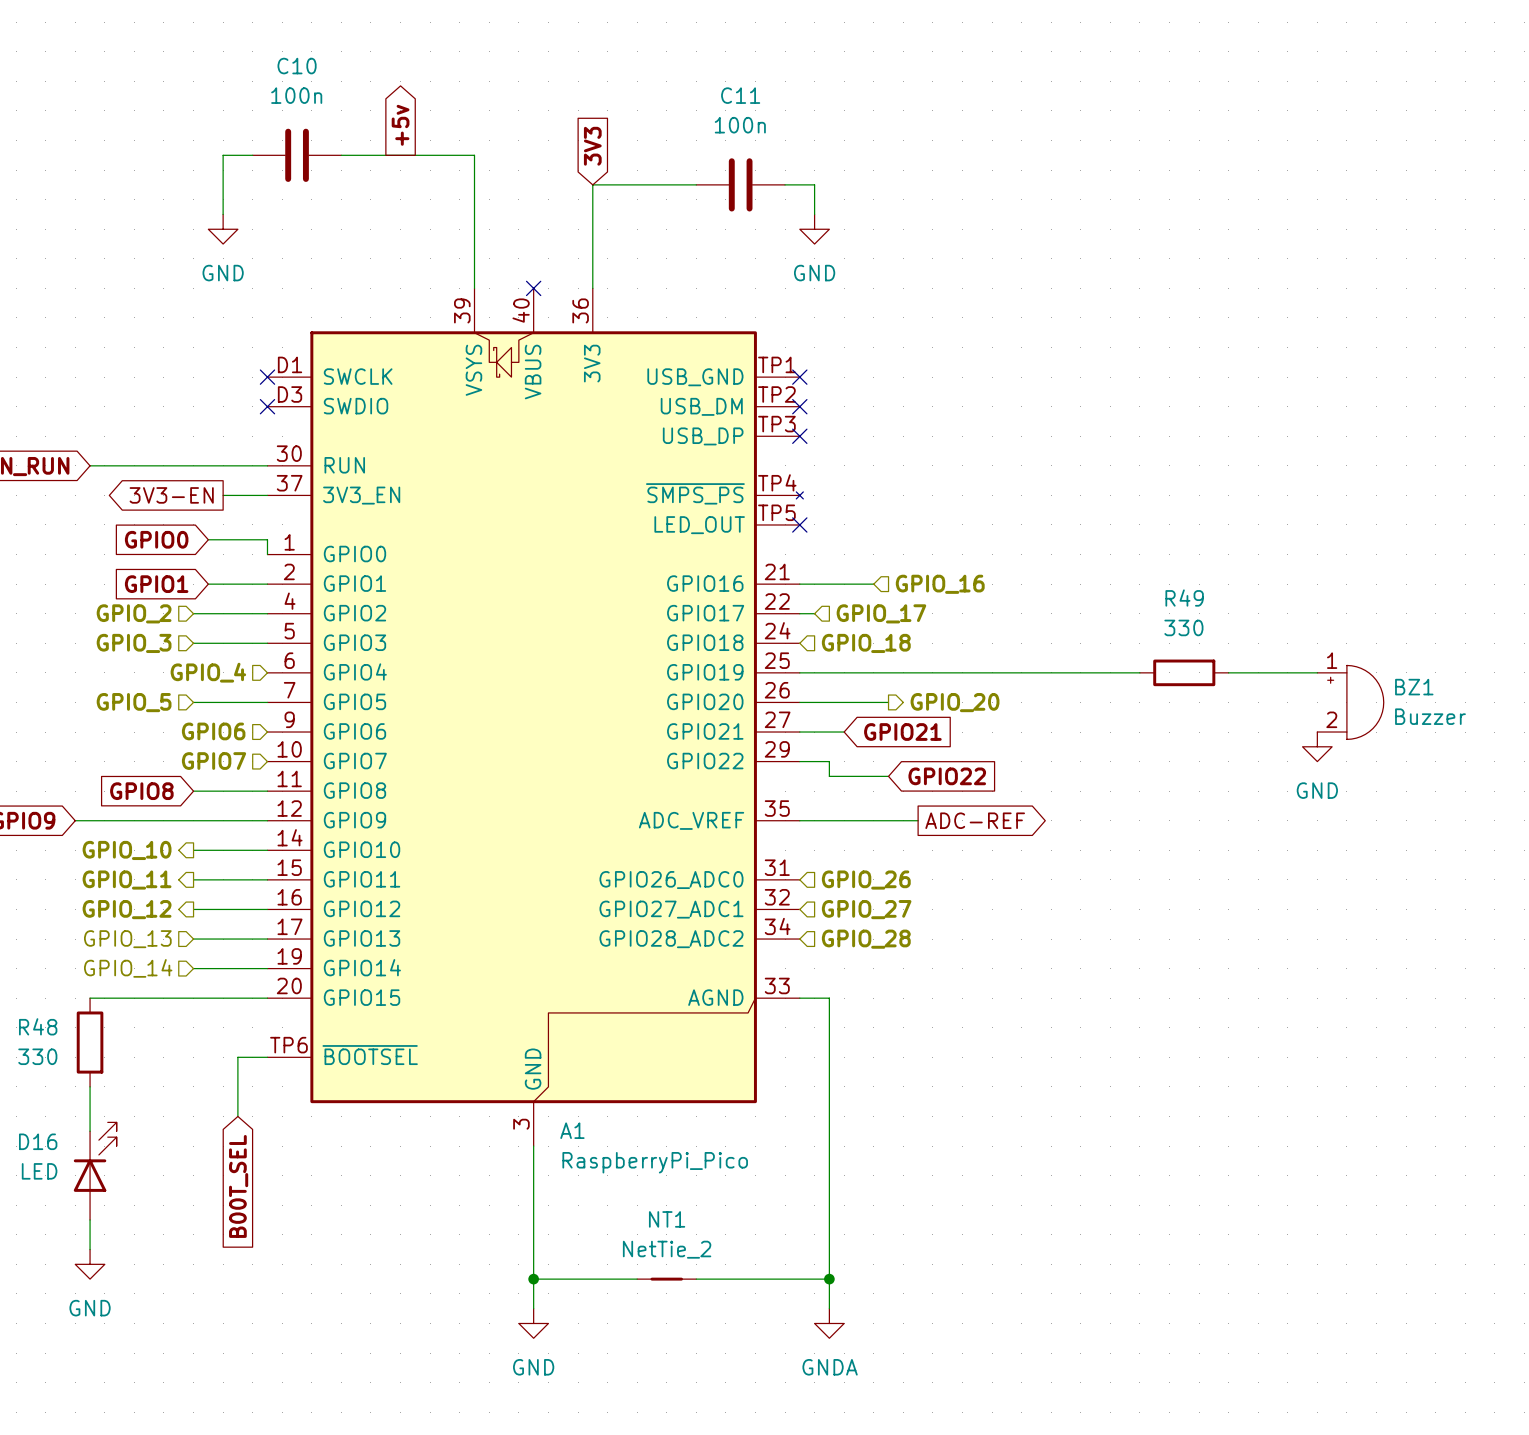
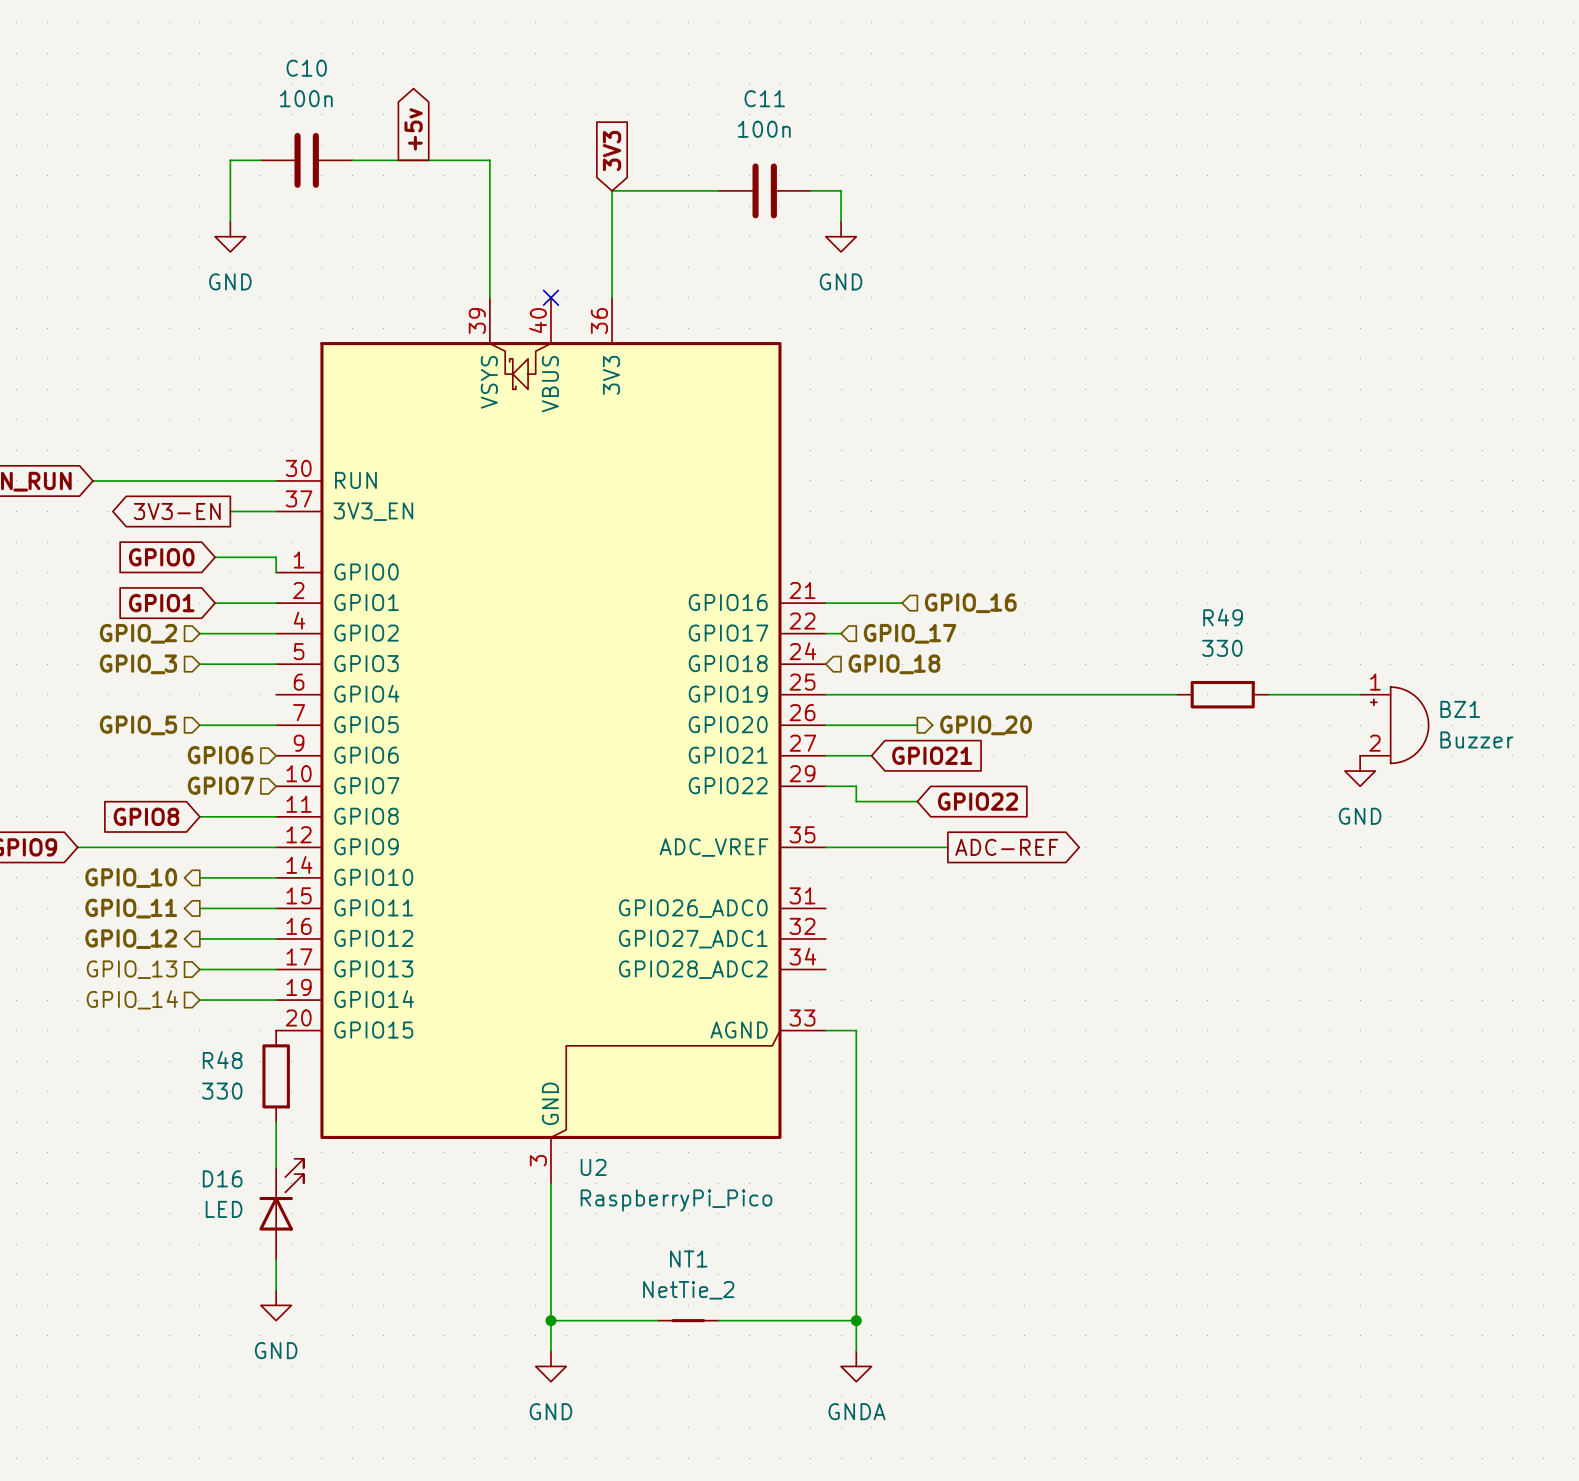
no-connect mark: (267, 377) -> none
no-connect mark: (799, 377) -> none
no-connect mark: (267, 406) -> none
no-connect mark: (799, 406) -> none
no-connect mark: (799, 436) -> none
no-connect mark: (799, 524) -> none
hierarchical label: GPIO_4 (208, 672) -> none
U2: none -> RaspberryPi_Pico (550, 740)
A1: RaspberryPi_Pico (535, 717) -> none
hierarchical label: GPIO_26 (866, 880) -> none
hierarchical label: GPIO_27 (866, 909) -> none
hierarchical label: GPIO_28 (866, 939) -> none
wire: (90, 998) (267, 998) -> none
R48 position: (90, 1042) -> (276, 1076)
wire: (267, 1057) (237, 1057) (237, 1116) -> none
wire: (90, 1086) (90, 1131) -> (276, 1122) (276, 1167)
D16 position: (95, 1171) -> (281, 1209)
global label: B00T_SEL (238, 1186) -> none
wire: (90, 1219) (90, 1249) -> (276, 1259) (276, 1290)
power symbol position: GND (90, 1264) -> GND (276, 1305)

